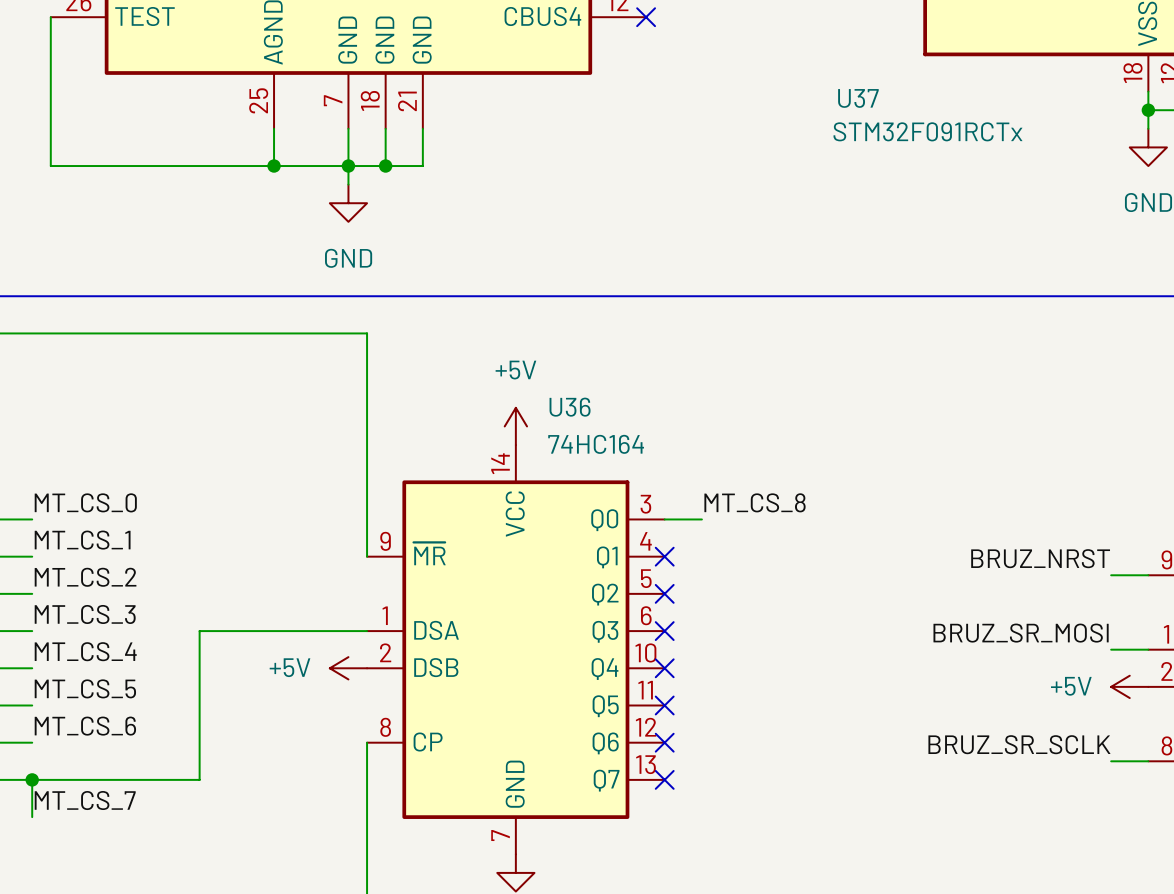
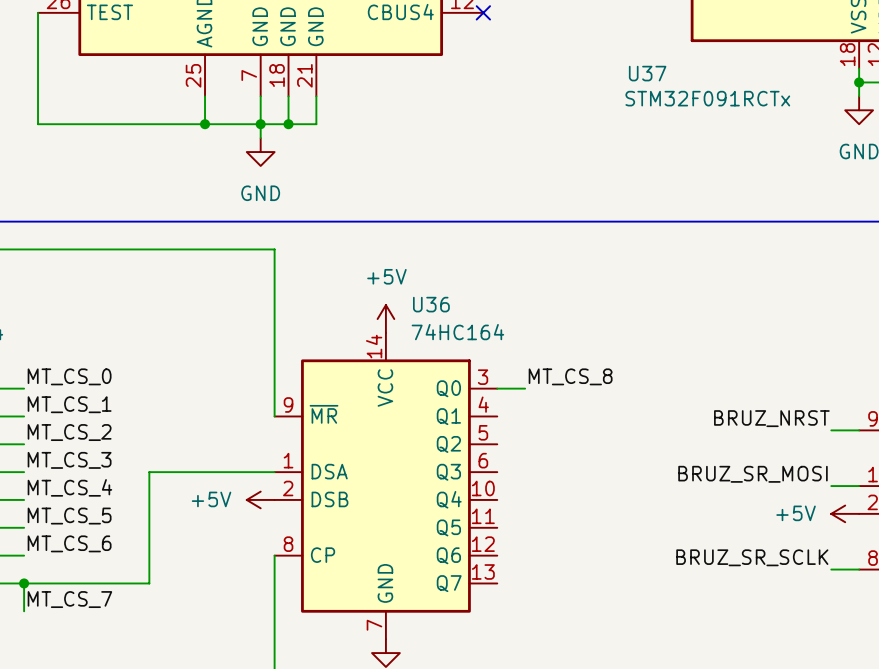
no-connect mark: (664, 556) -> none
no-connect mark: (664, 593) -> none
no-connect mark: (664, 631) -> none
no-connect mark: (664, 668) -> none
no-connect mark: (664, 705) -> none
no-connect mark: (664, 742) -> none
no-connect mark: (664, 779) -> none

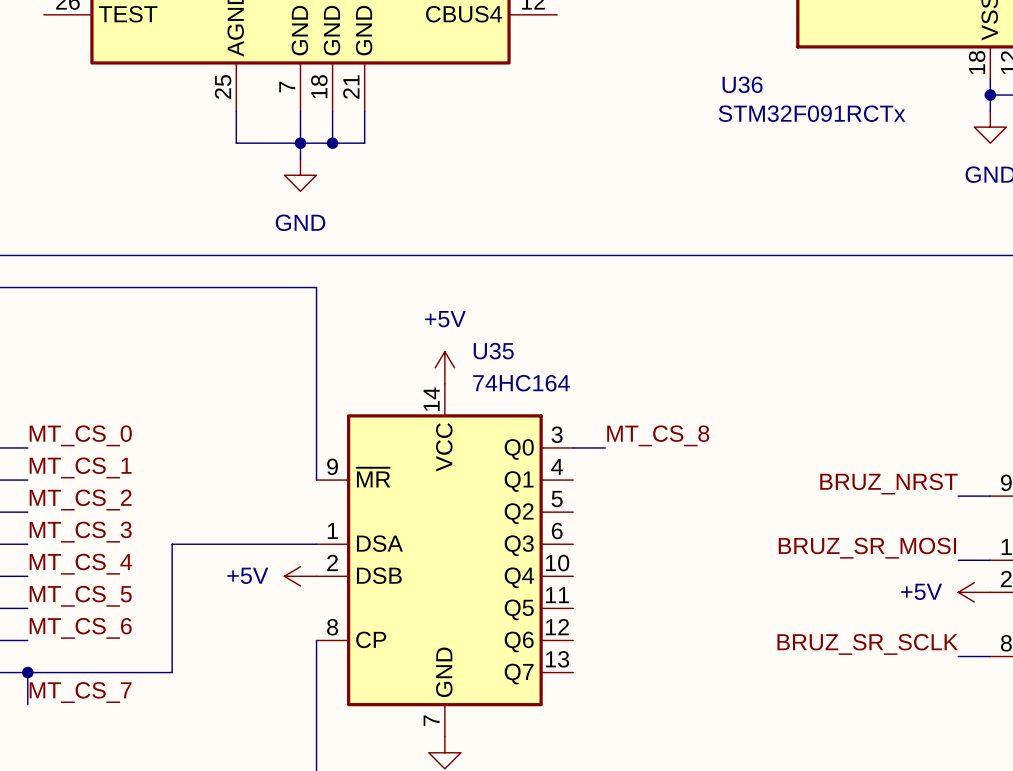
wire: (38, 12) (38, 124) (205, 124) -> none
no-connect mark: (483, 12) -> none
U37 name: U37 (647, 73) -> U36 (742, 84)
junction: (205, 124) -> none
U36 name: U36 (431, 304) -> U35 (493, 351)

